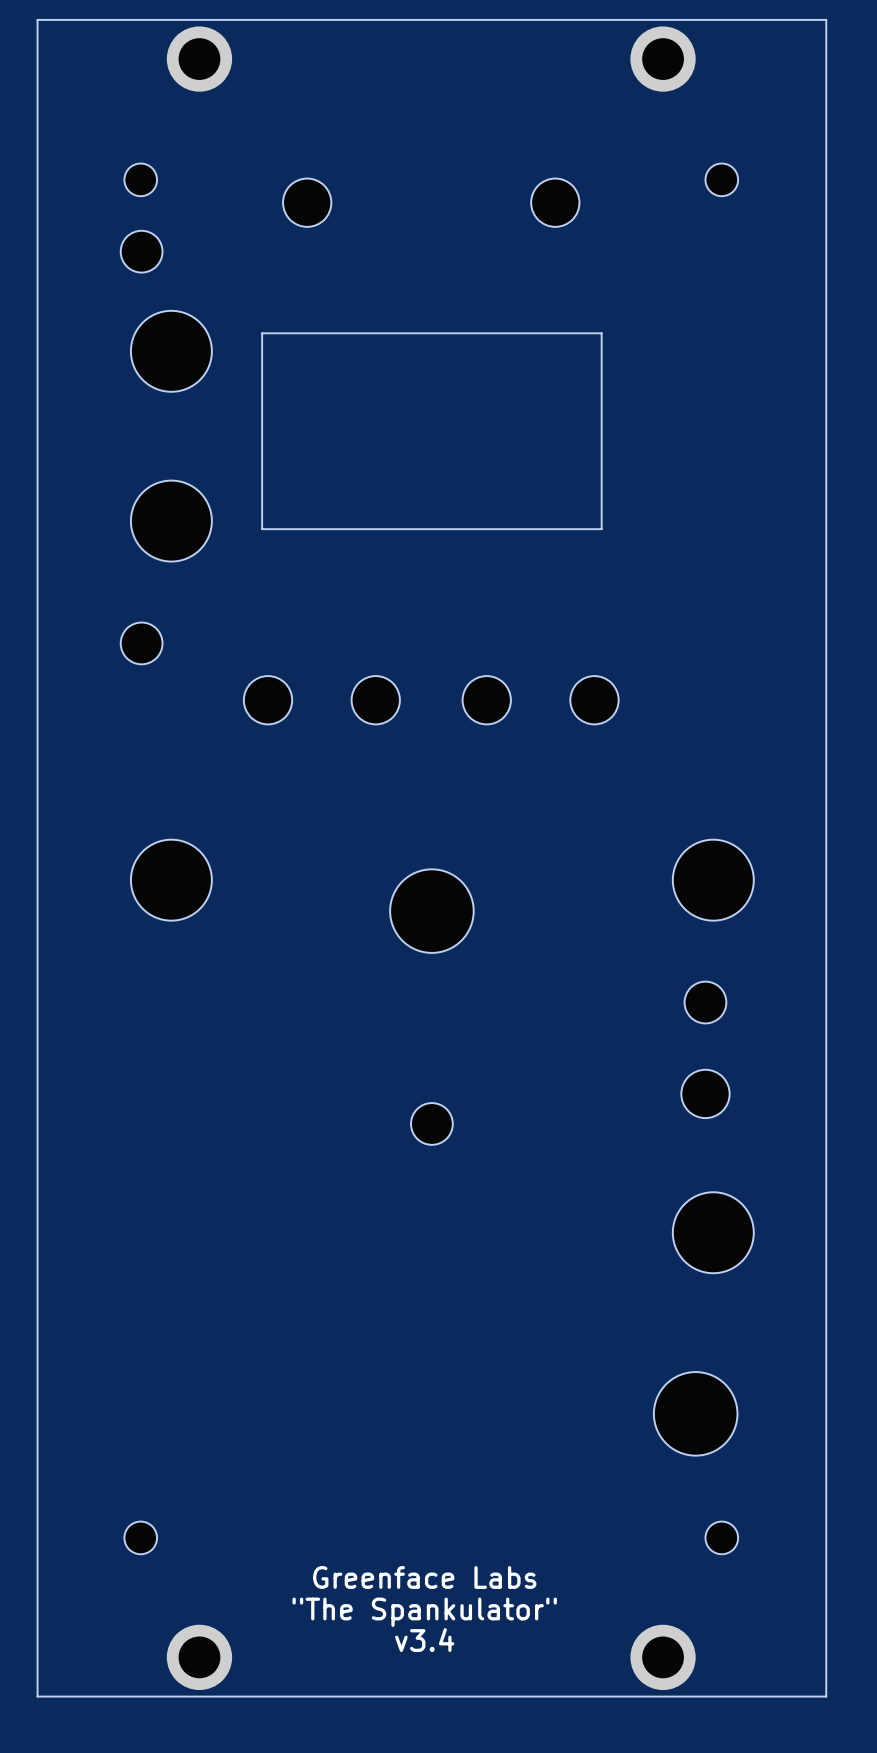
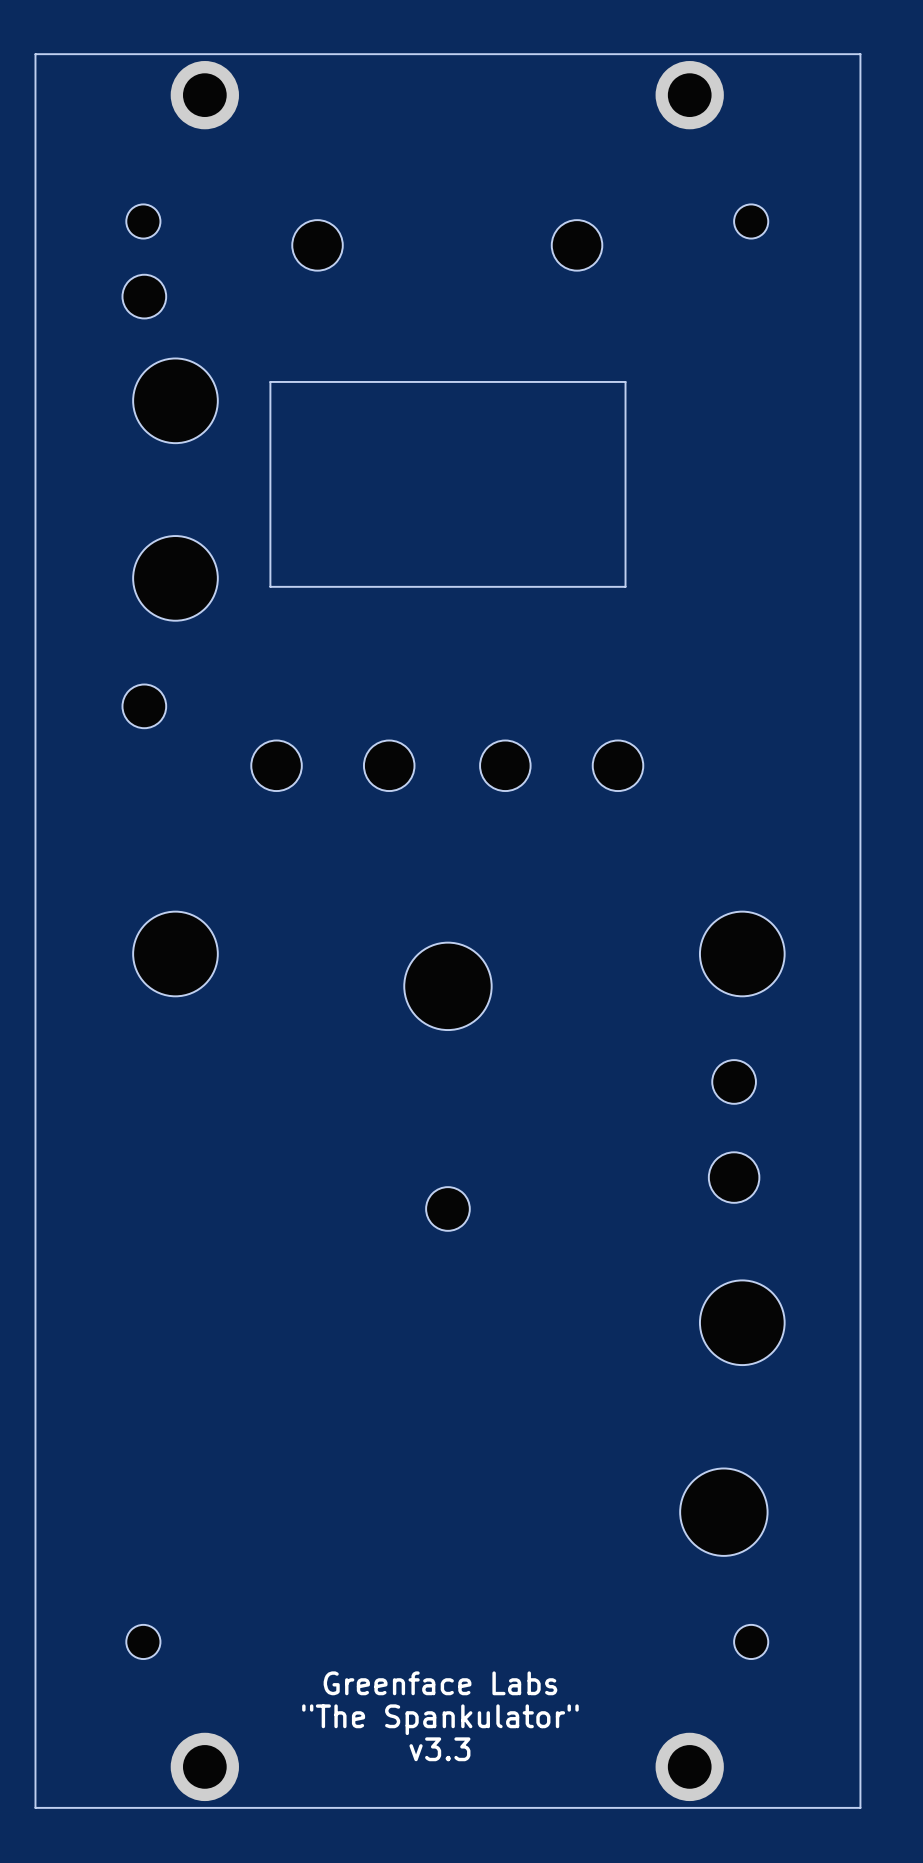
text: v3.4 (424, 1640) -> v3.3 (439, 1749)

